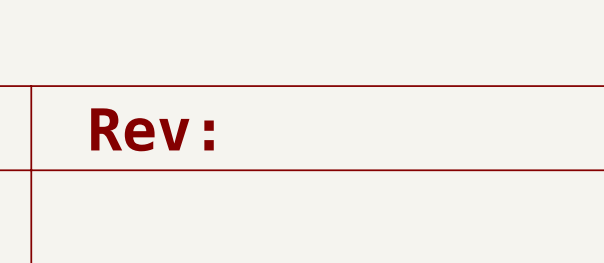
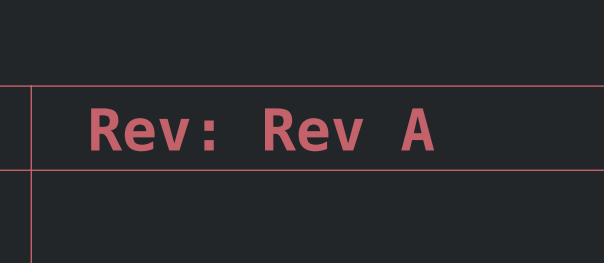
title block: Rev: (152, 129) -> Rev: Rev A (262, 129)

